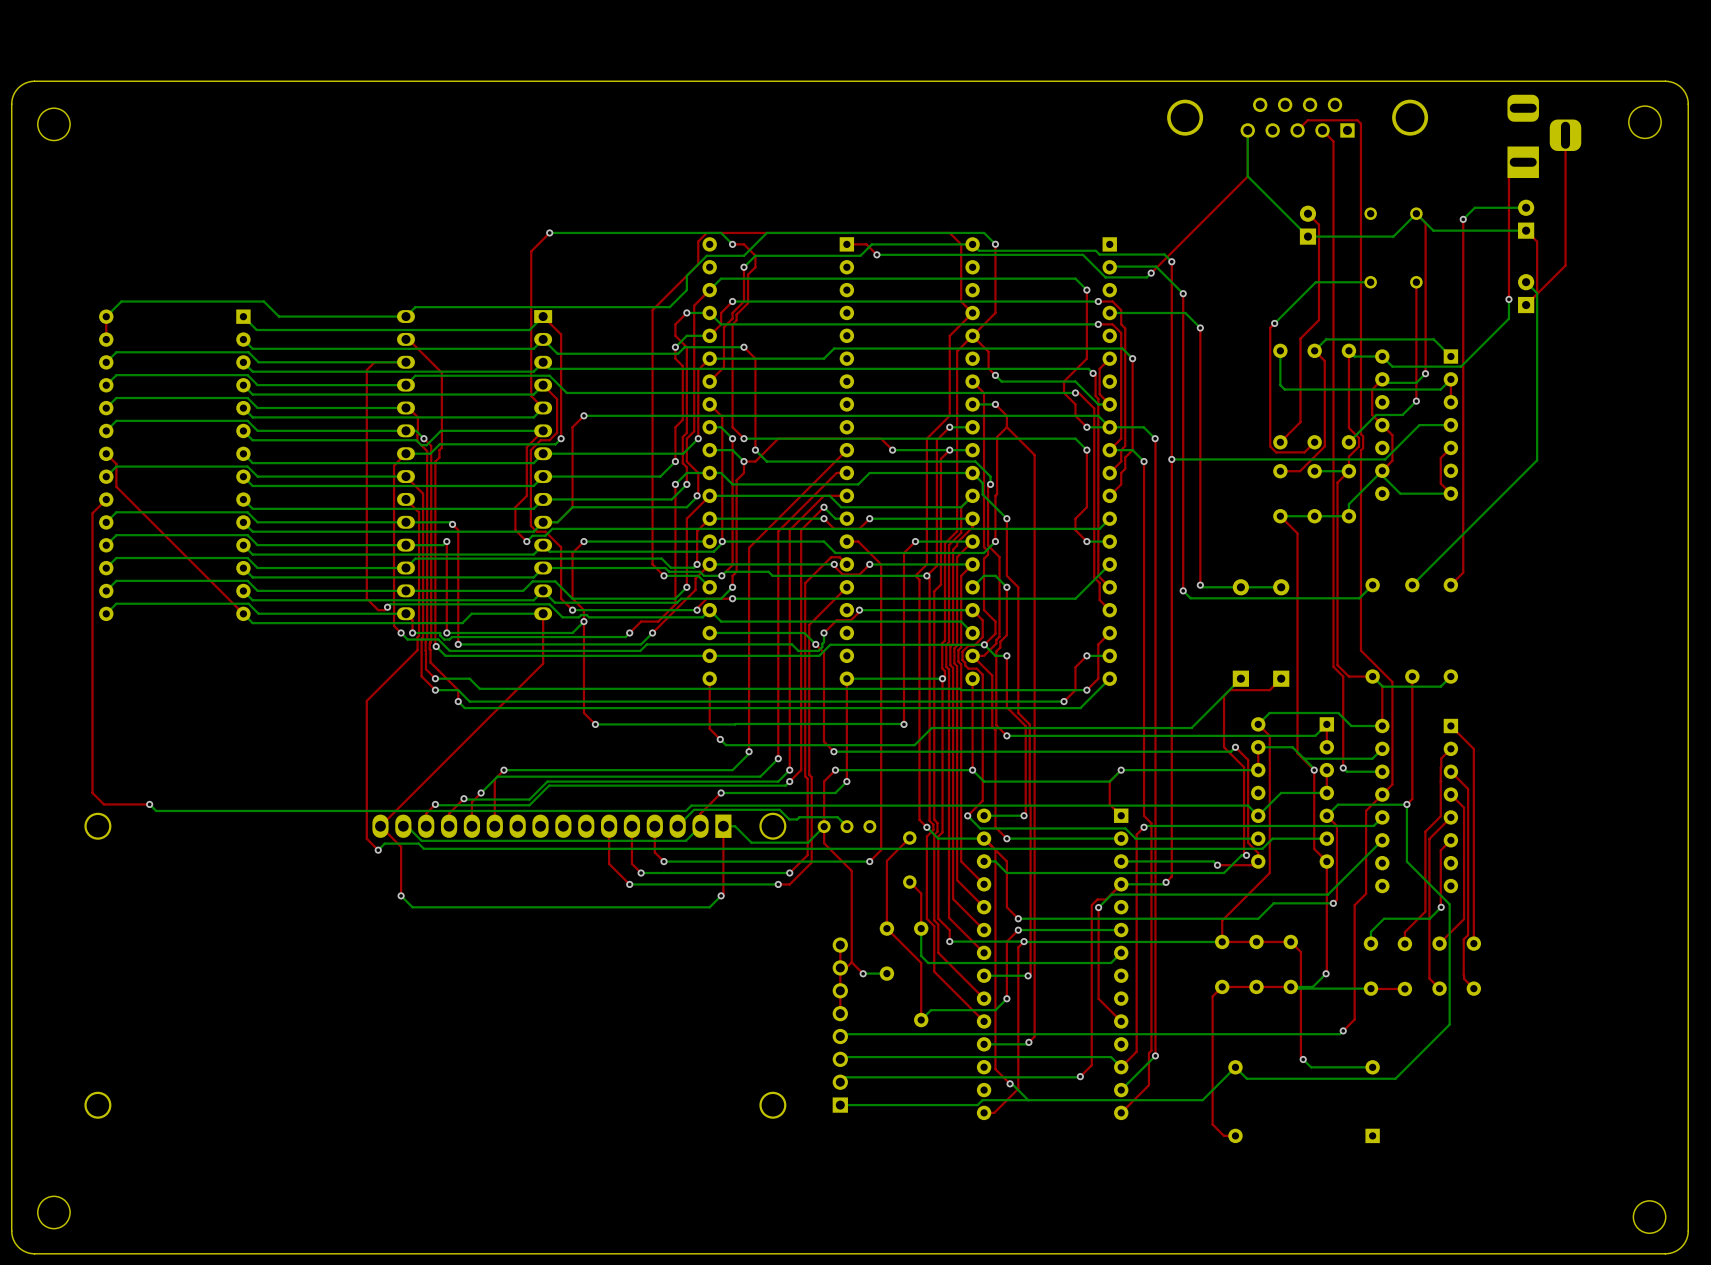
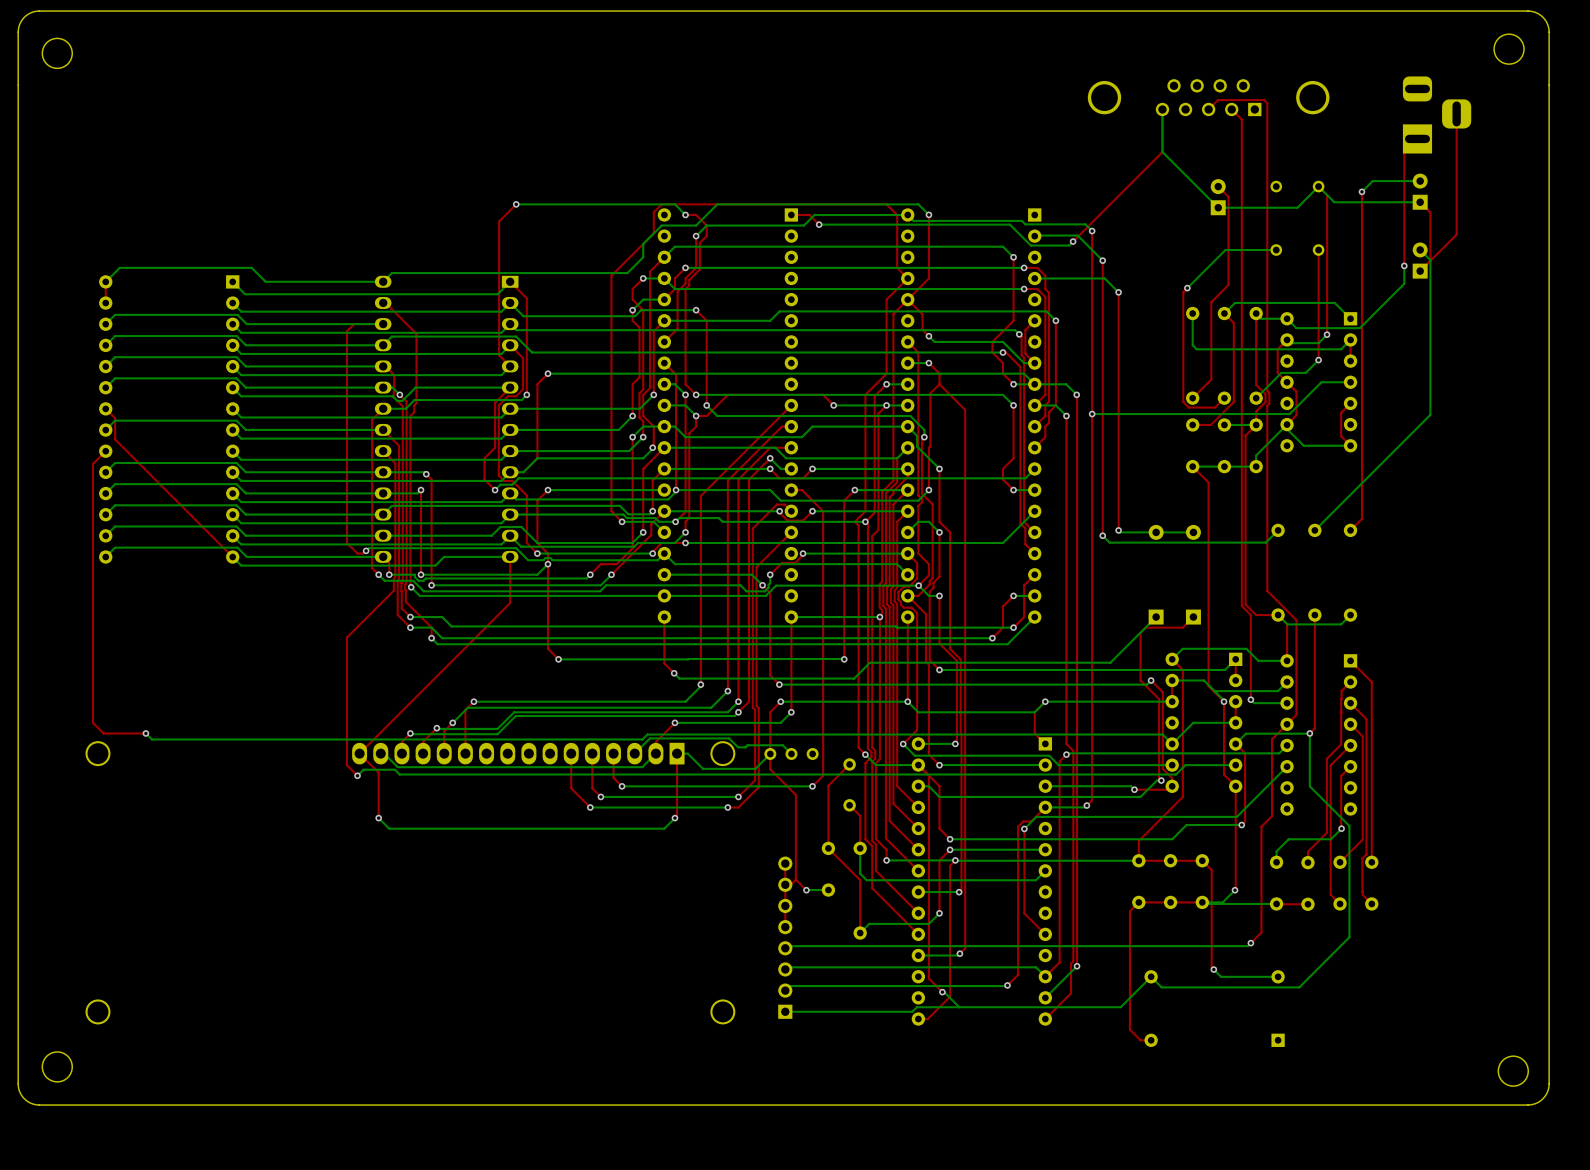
board edge: (11, 104) (13, 95) (18, 87) (25, 83) (34, 81) (1665, 81) (1677, 84) (1685, 94) (1688, 104) (1688, 1230) (1685, 1240) (1681, 1247) (1675, 1251) (1665, 1253) (34, 1253) (20, 1249) (12, 1236) (11, 1182) -> (18, 85) (18, 27) (26, 15) (39, 11) (1527, 11) (1537, 13) (1542, 17) (1547, 25) (1549, 32) (1549, 1083) (1545, 1095) (1539, 1101) (1527, 1105) (39, 1105) (32, 1103) (24, 1098) (19, 1090) (18, 1083)
round board edge position: (1644, 122) -> (1509, 49)
round board edge position: (53, 124) -> (57, 53)
round board edge position: (53, 1212) -> (57, 1066)
round board edge position: (1649, 1217) -> (1513, 1071)

